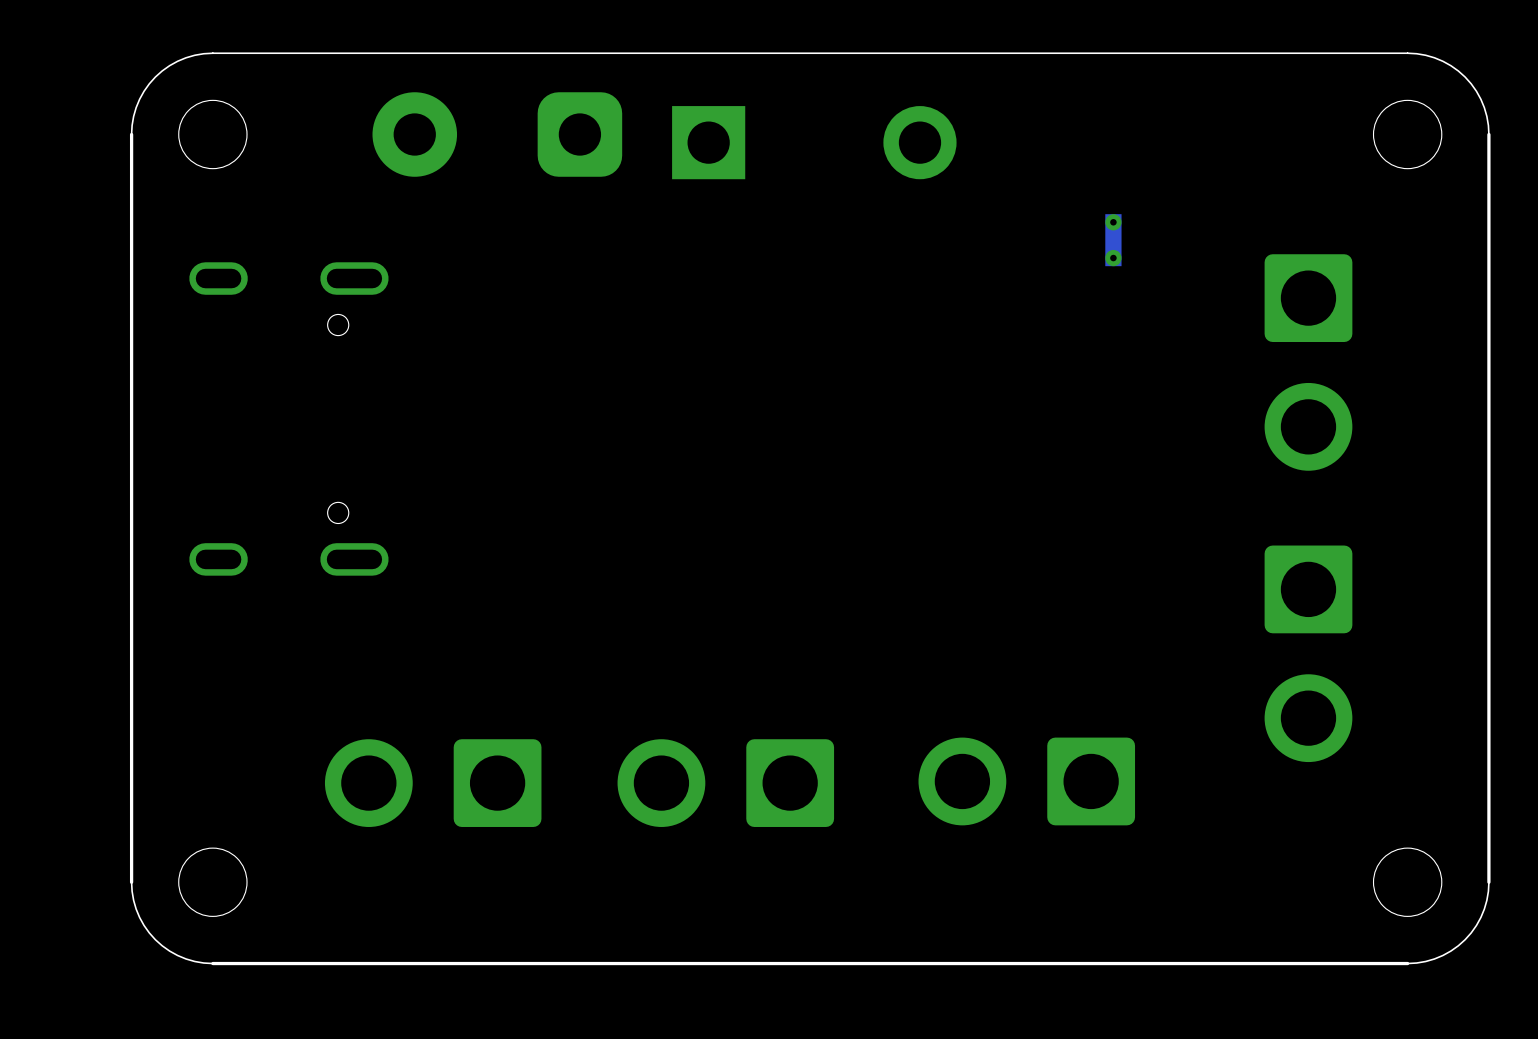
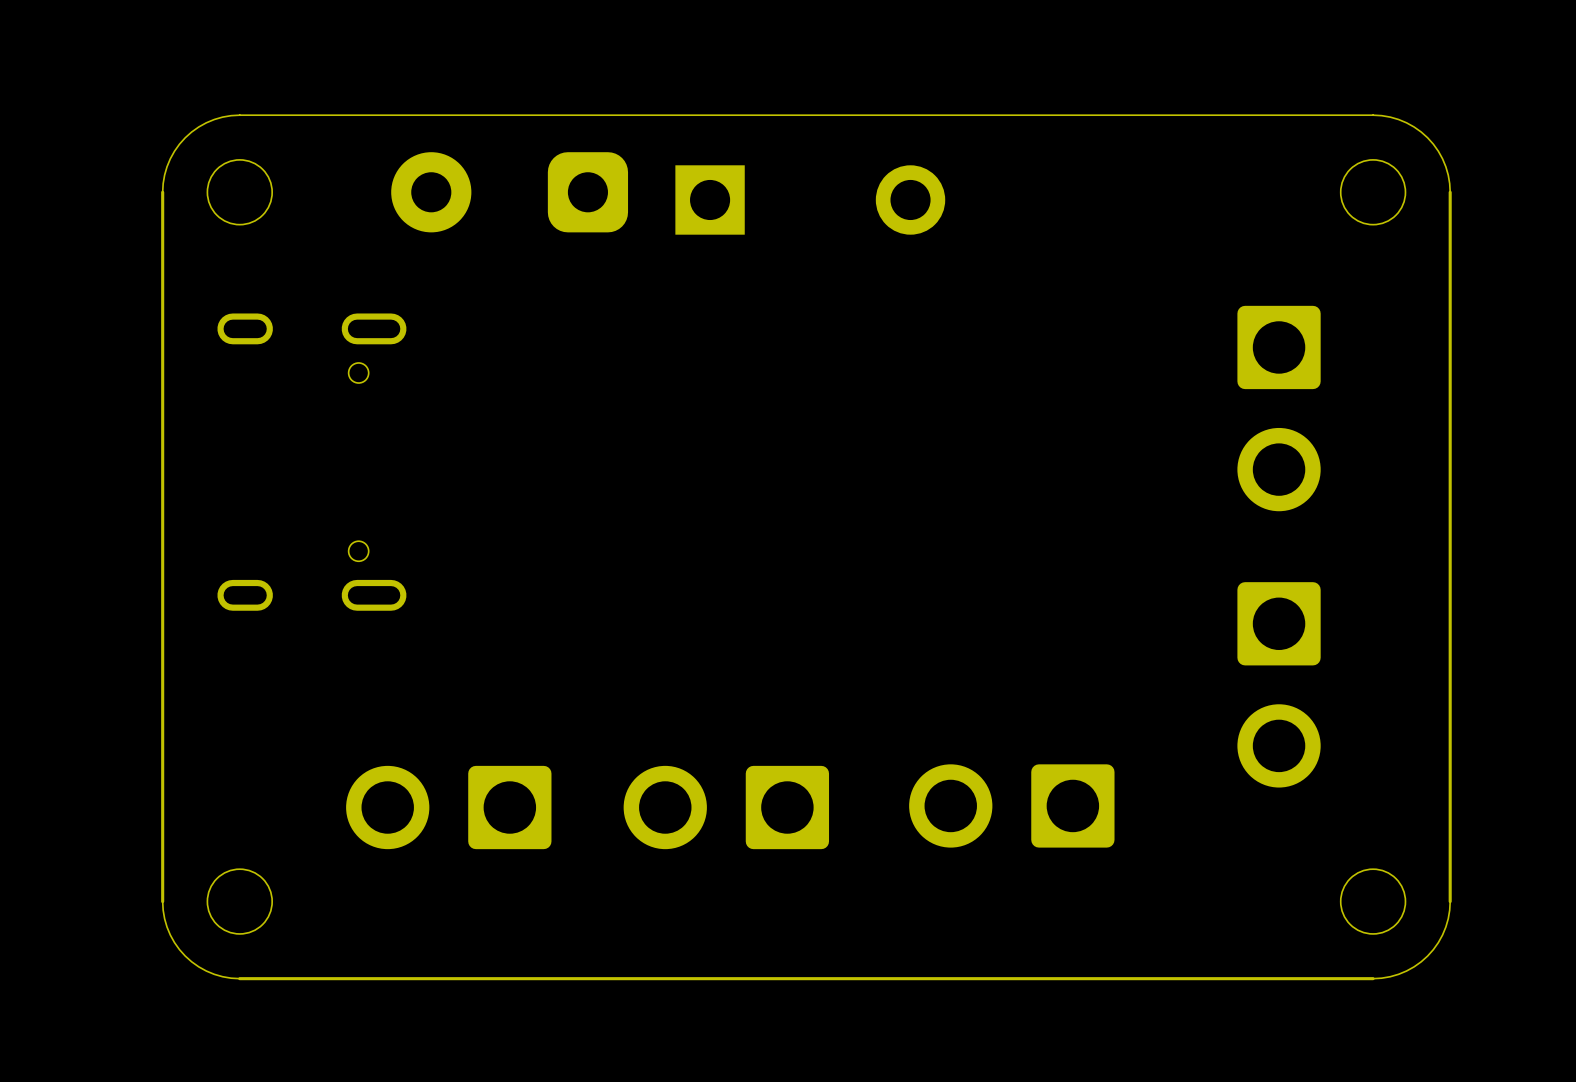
part: (1113, 240) -> none

